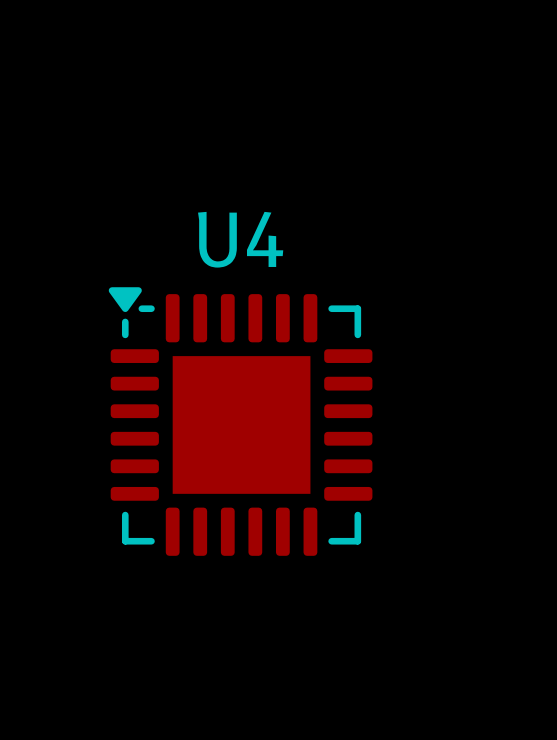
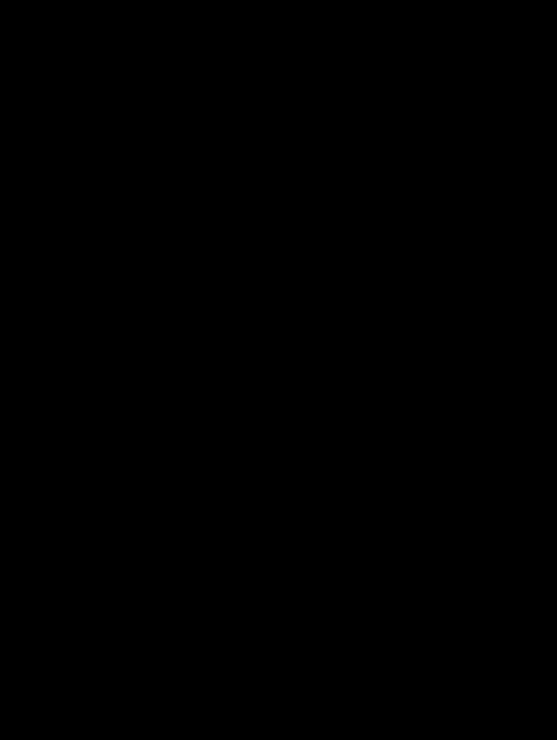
U4: (240, 421) -> none

